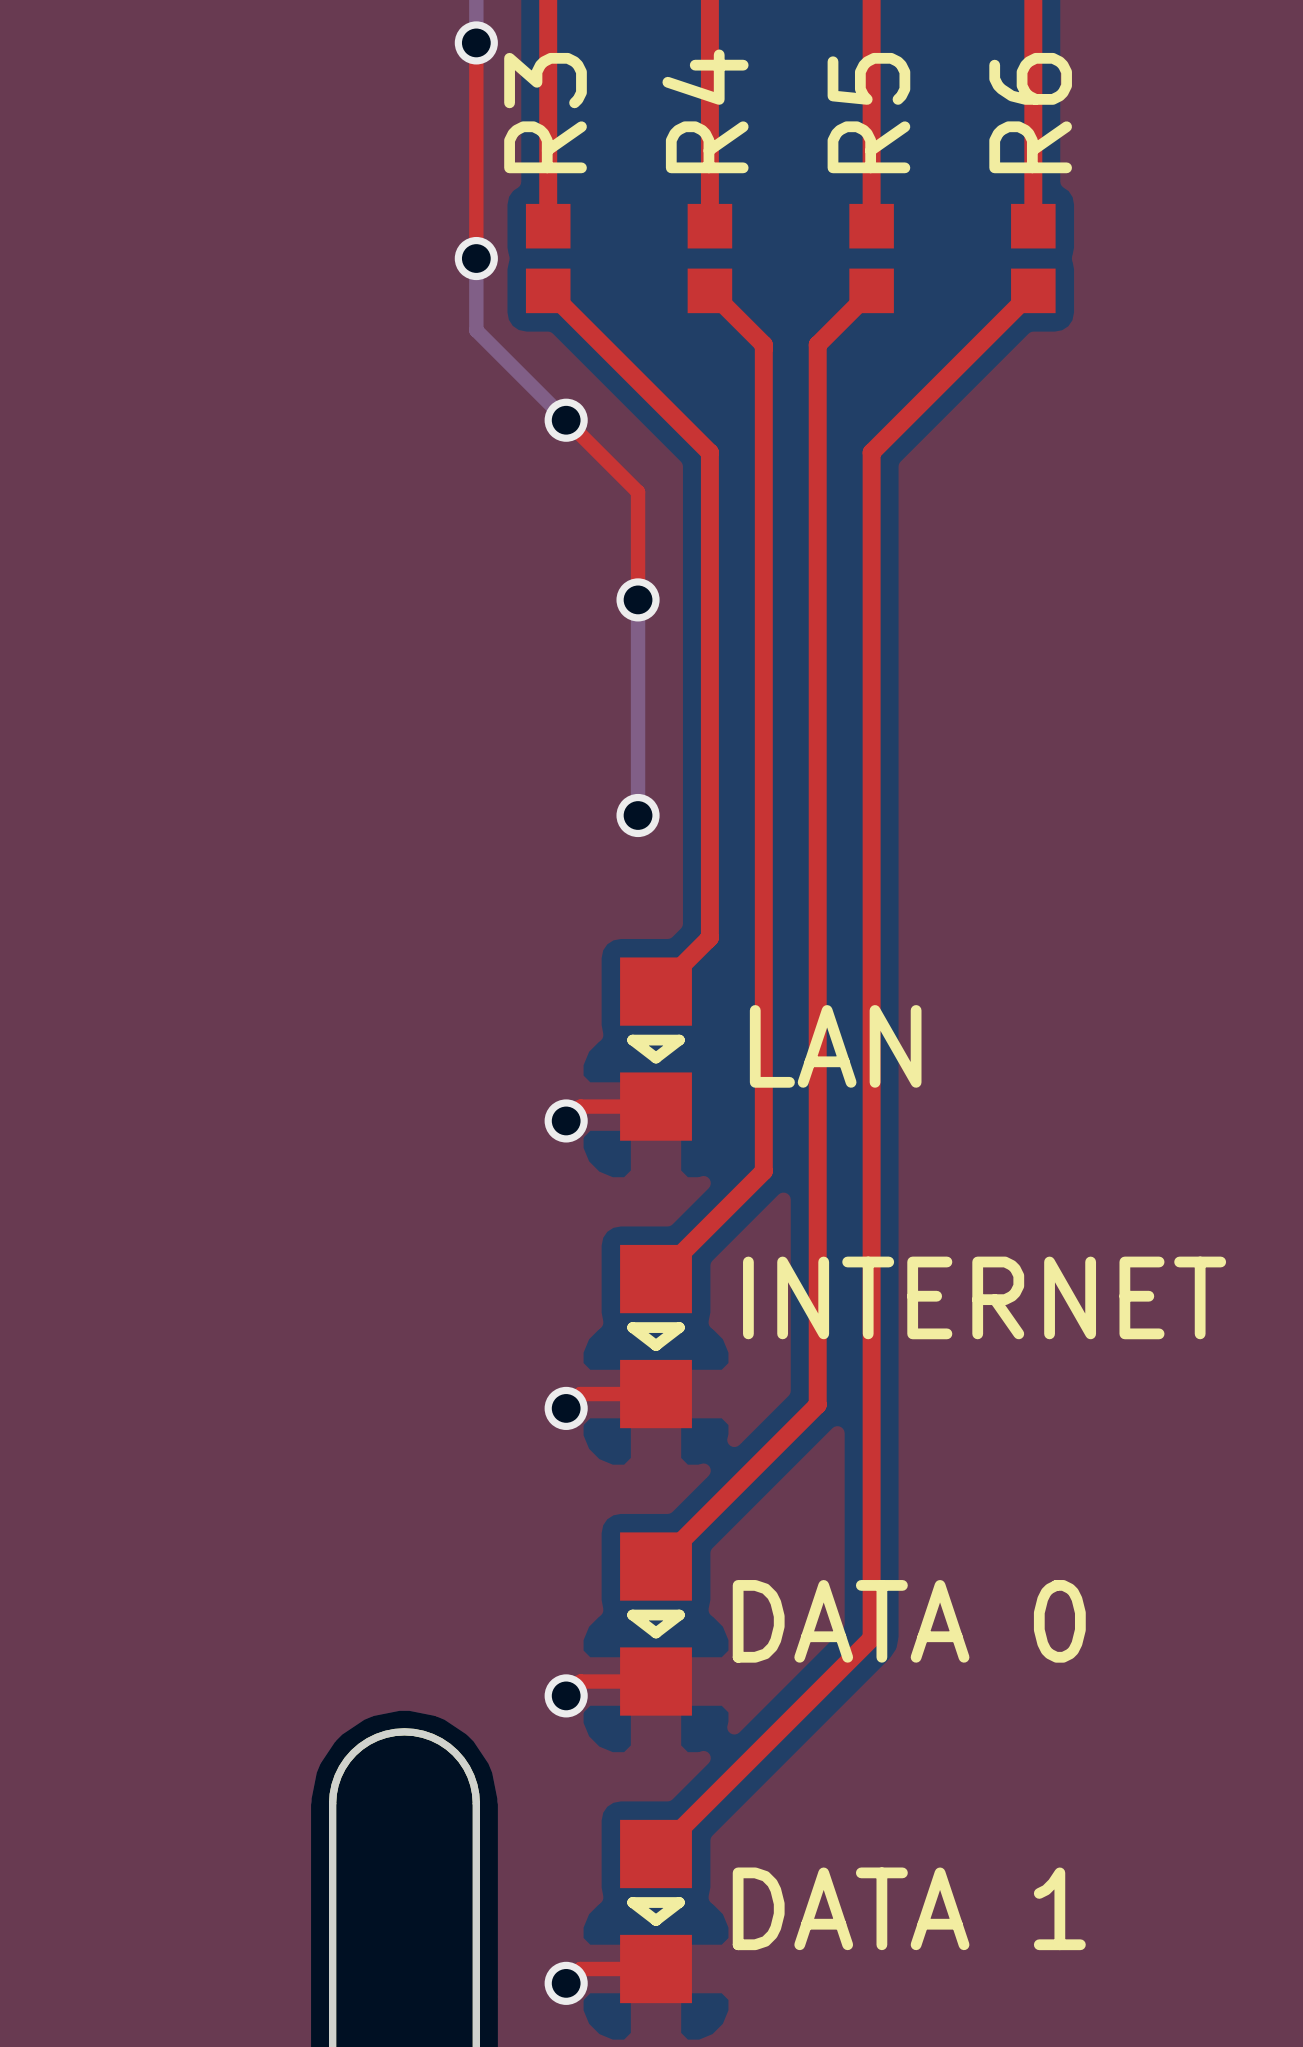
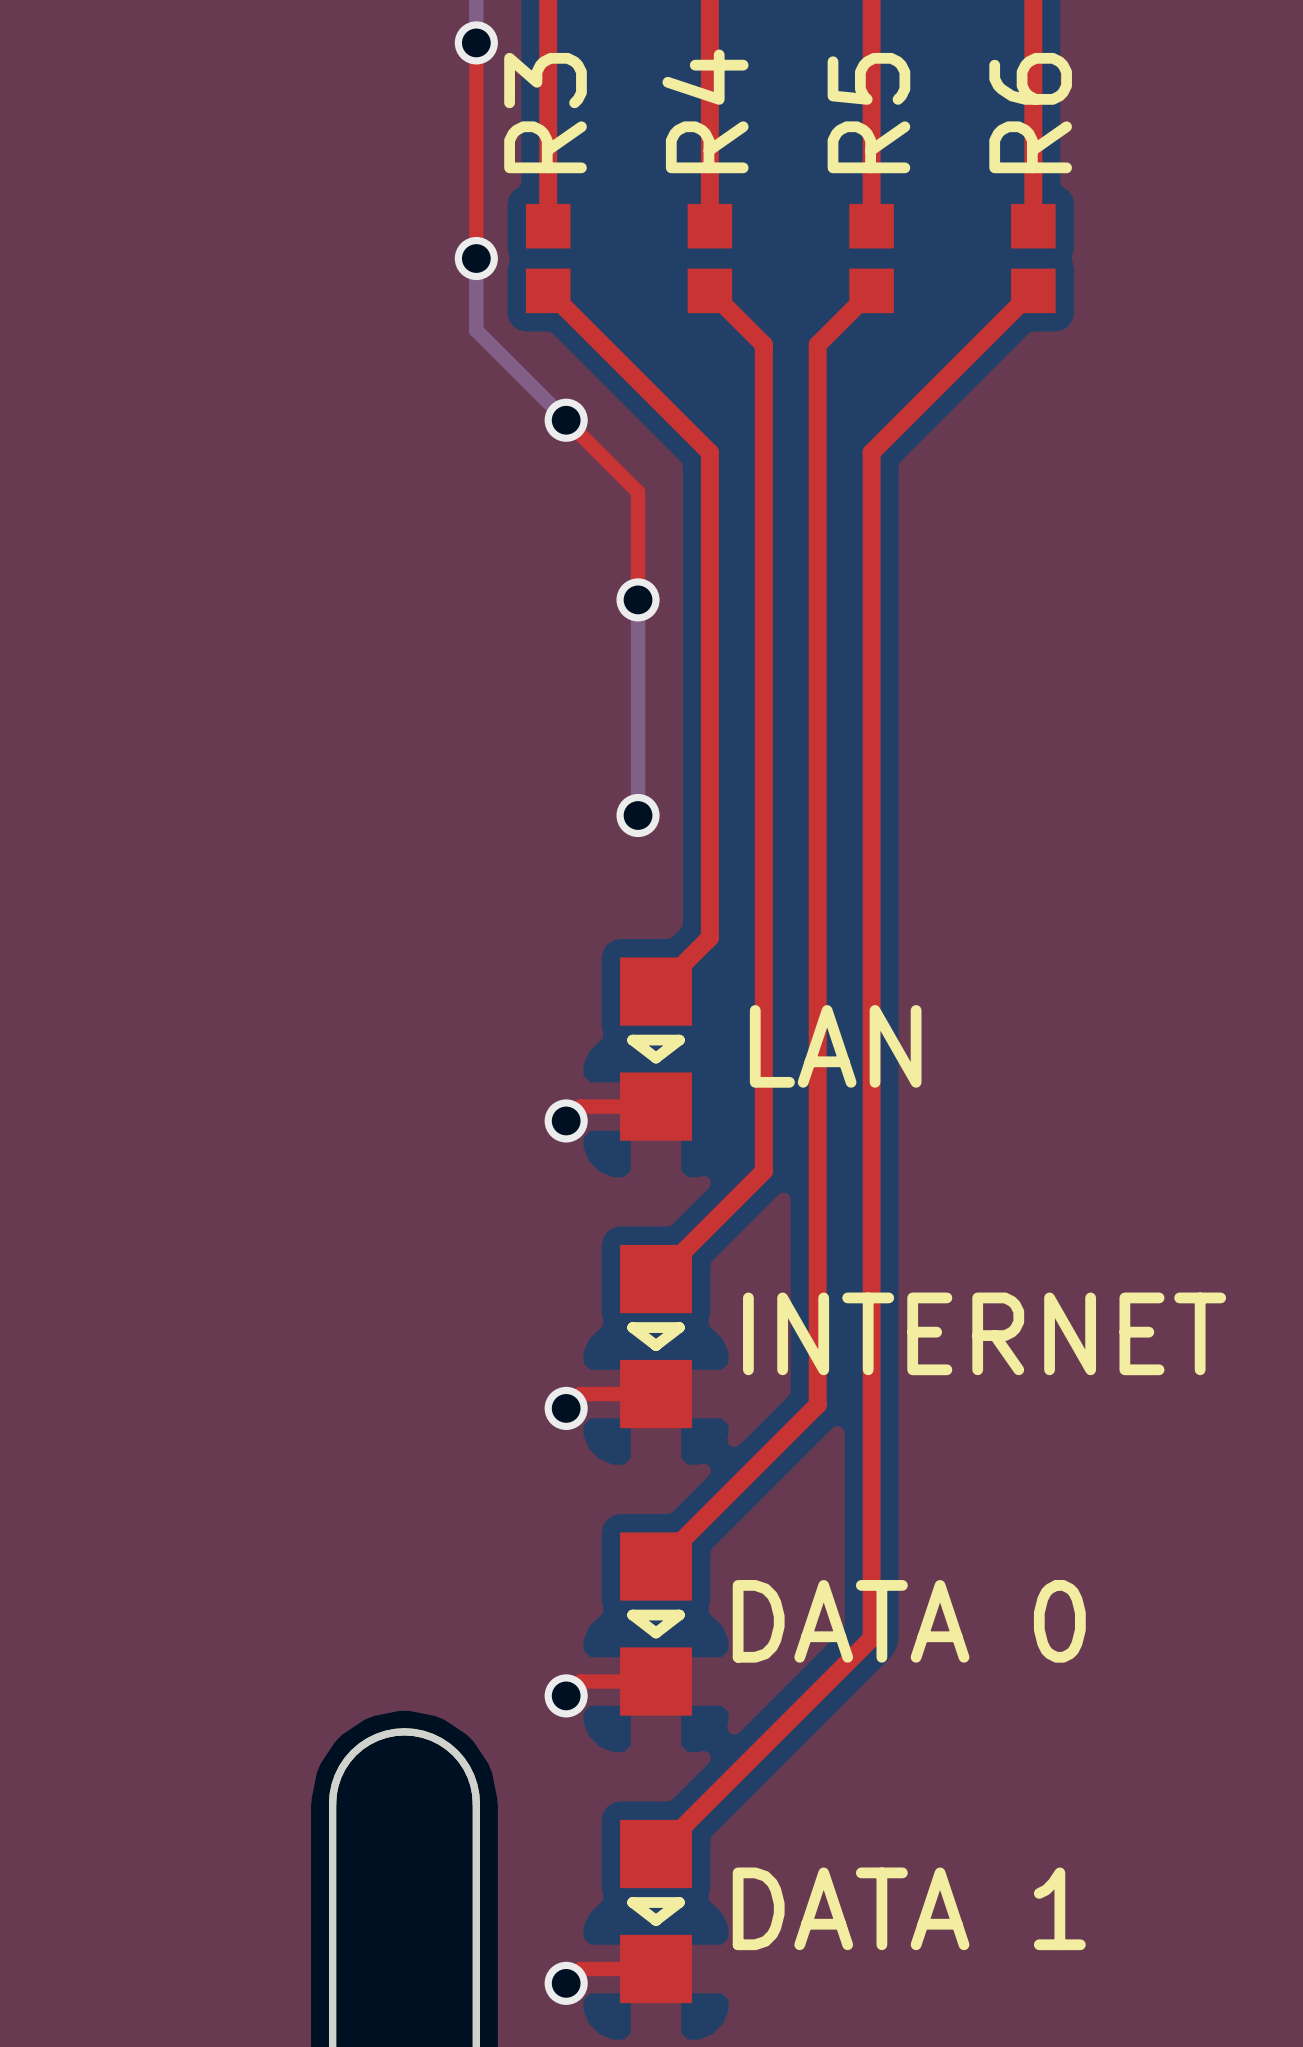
part value position: INTERNET (984, 1297) -> INTERNET (984, 1333)

